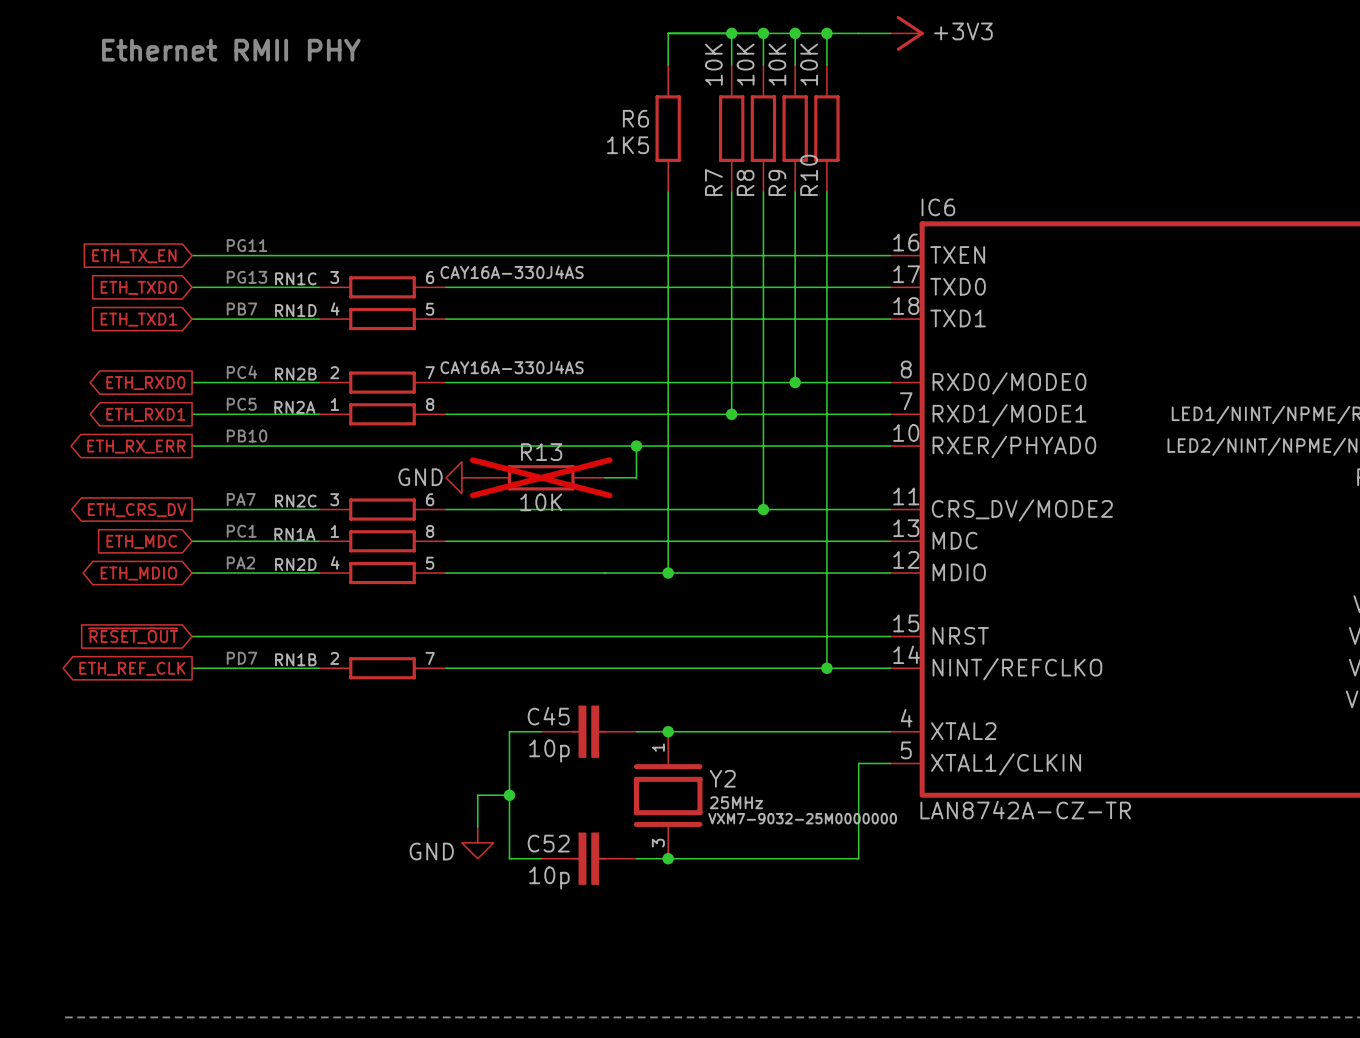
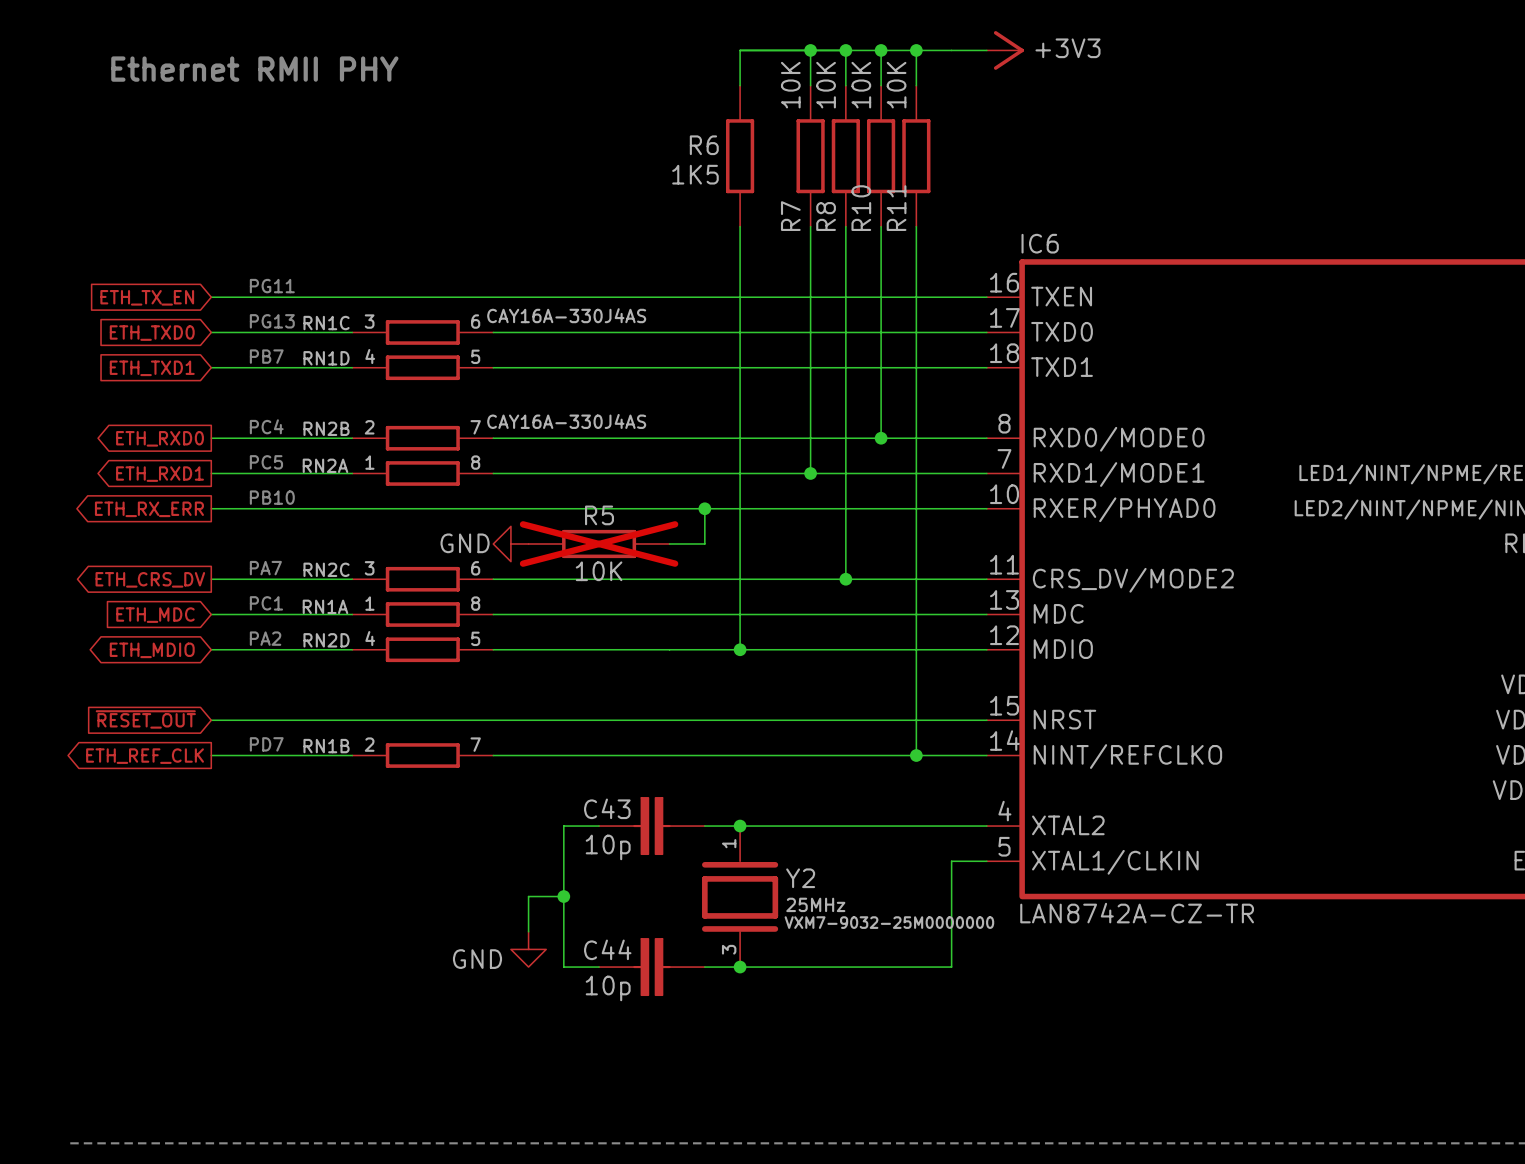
R10 name: R10 (809, 175) -> R11 (896, 208)
R9 name: R9 (777, 182) -> R10 (861, 208)
R13 name: R13 (541, 452) -> R5 (599, 515)
C45 name: C45 (548, 716) -> C43 (607, 808)
C52 name: C52 (548, 843) -> C44 (607, 949)

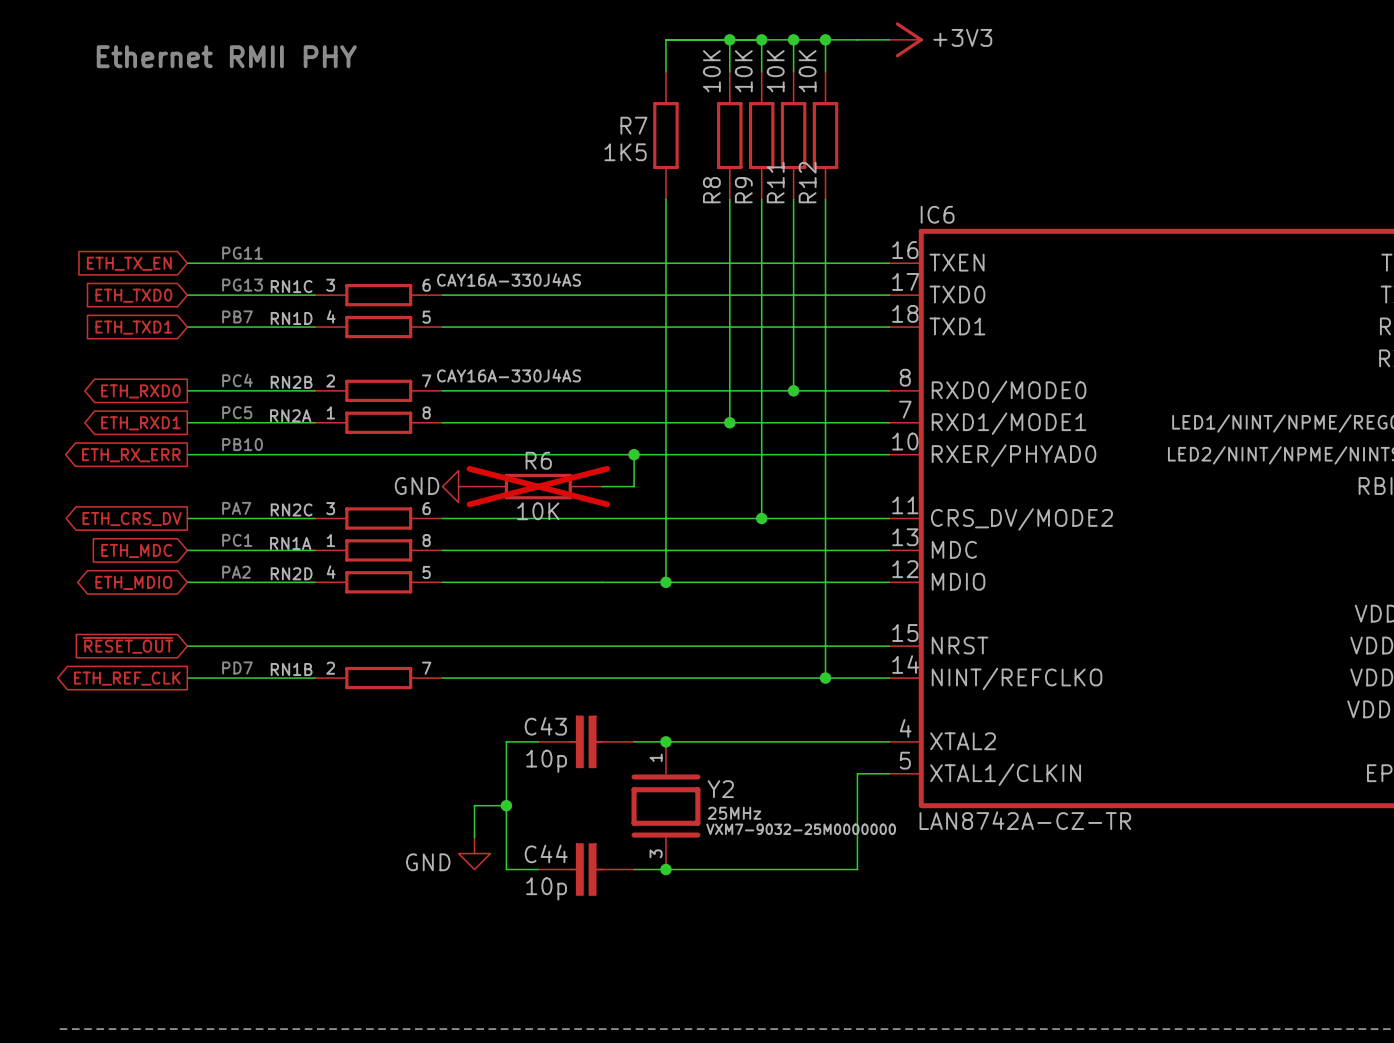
R6 name: R6 (704, 145) -> R7 (633, 125)
R10 name: R10 (861, 208) -> R11 (775, 182)
R11 name: R11 (896, 208) -> R12 (807, 182)
R7 name: R7 (790, 216) -> R8 (711, 190)
R8 name: R8 (826, 216) -> R9 (743, 190)
R5 name: R5 (599, 515) -> R6 (538, 460)

